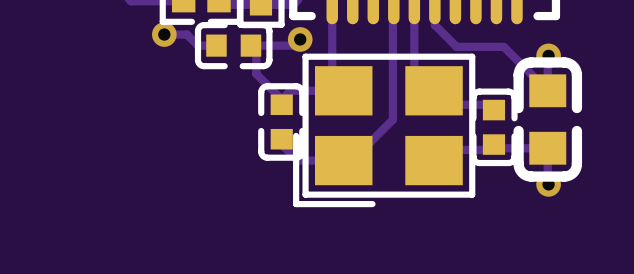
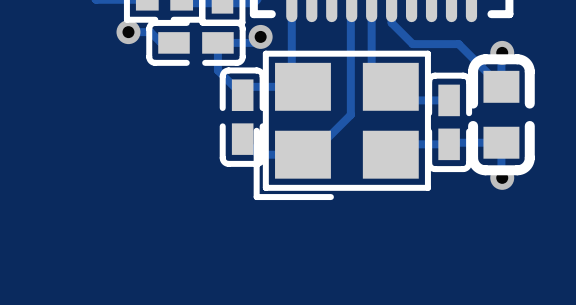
part footprint: [194, 22, 273, 70] -> [146, 19, 246, 66]
part footprint: [258, 83, 306, 161] -> [219, 67, 266, 167]
part footprint: [470, 88, 518, 167] -> [426, 72, 473, 173]

